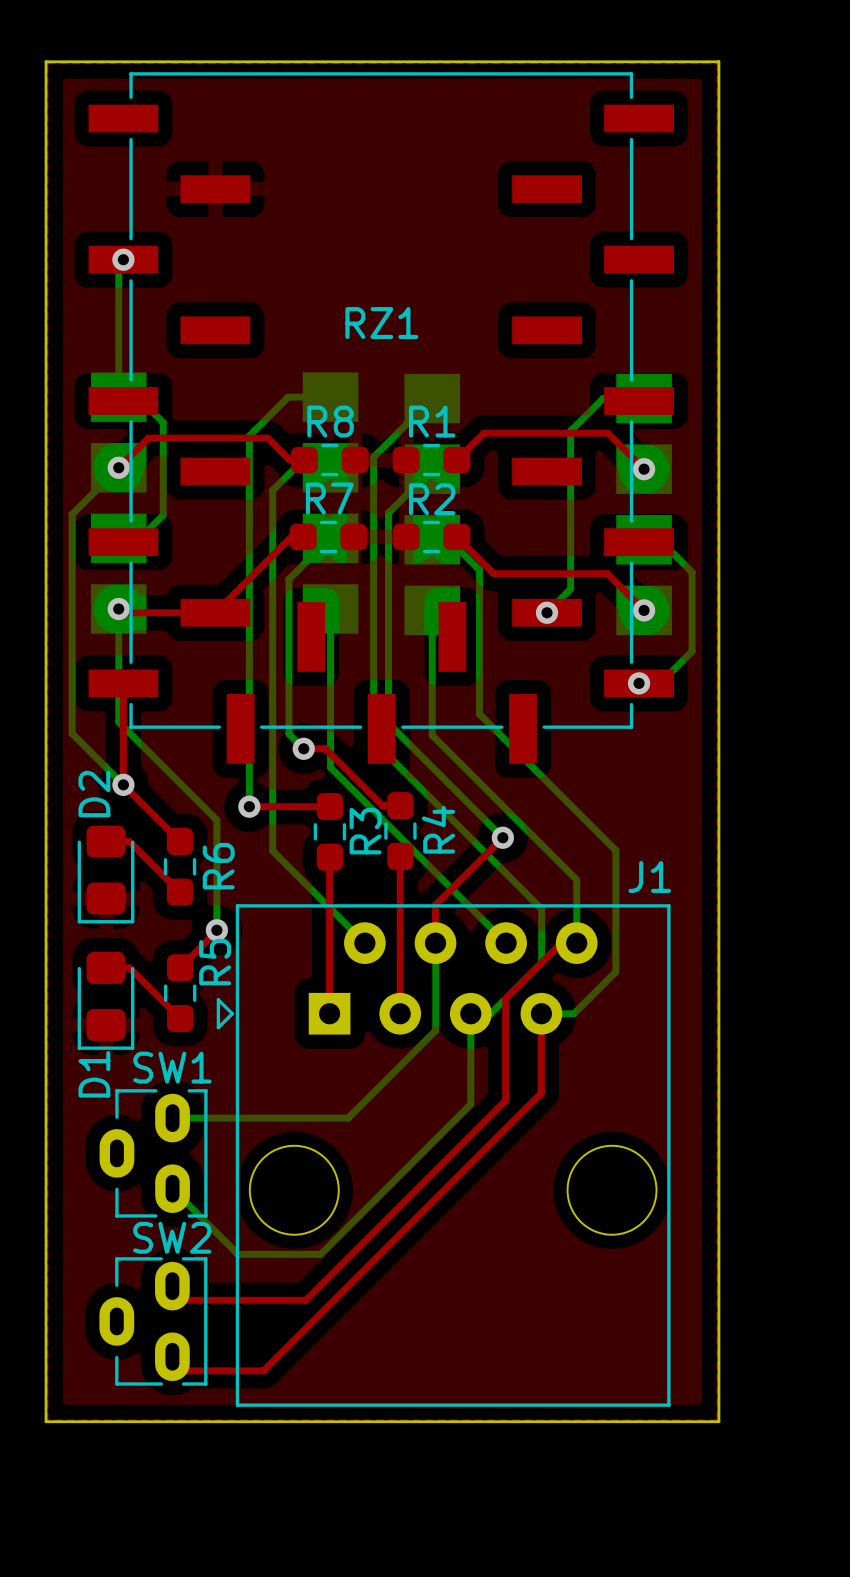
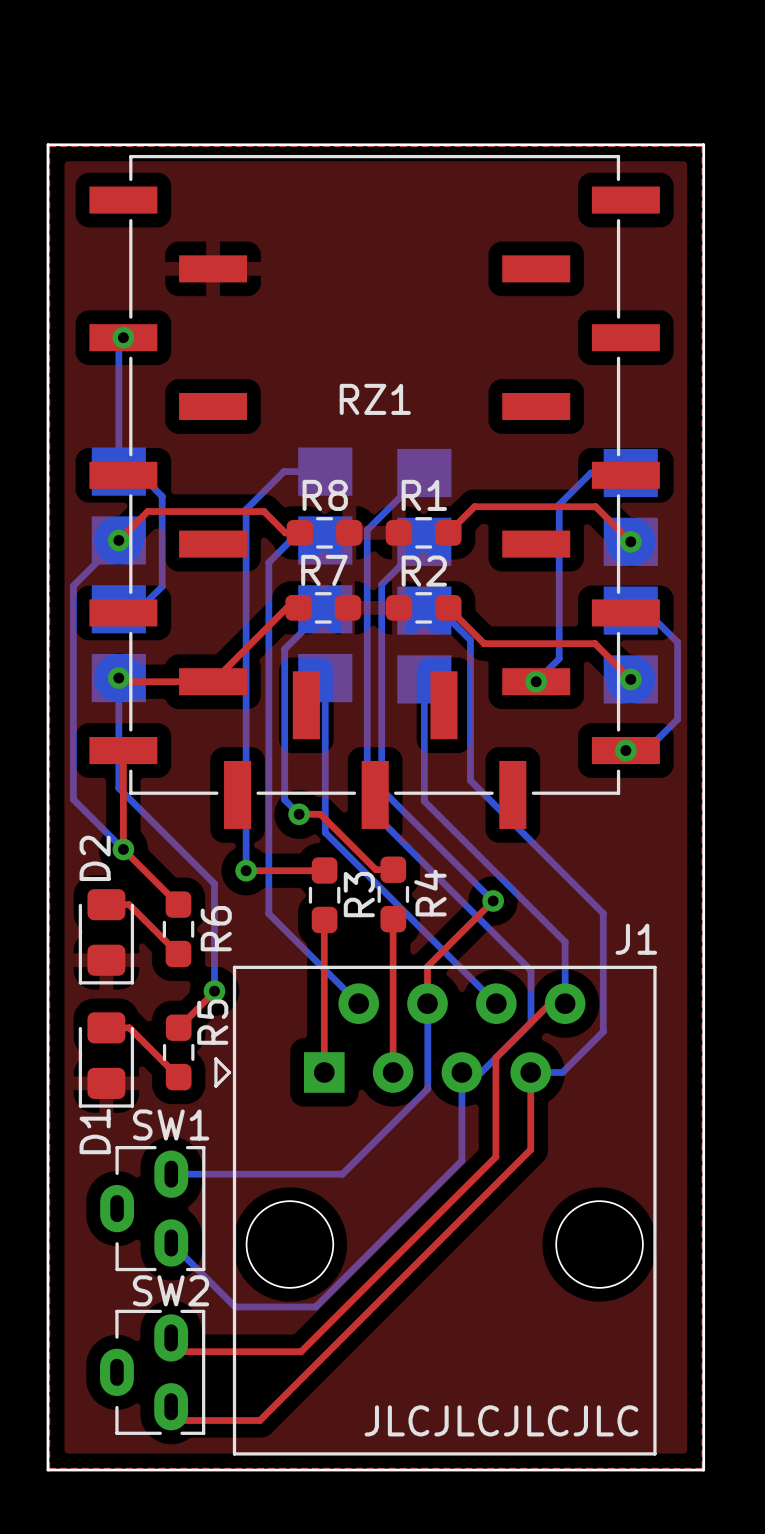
text: none -> JLCJLCJLCJLC (501, 1420)

